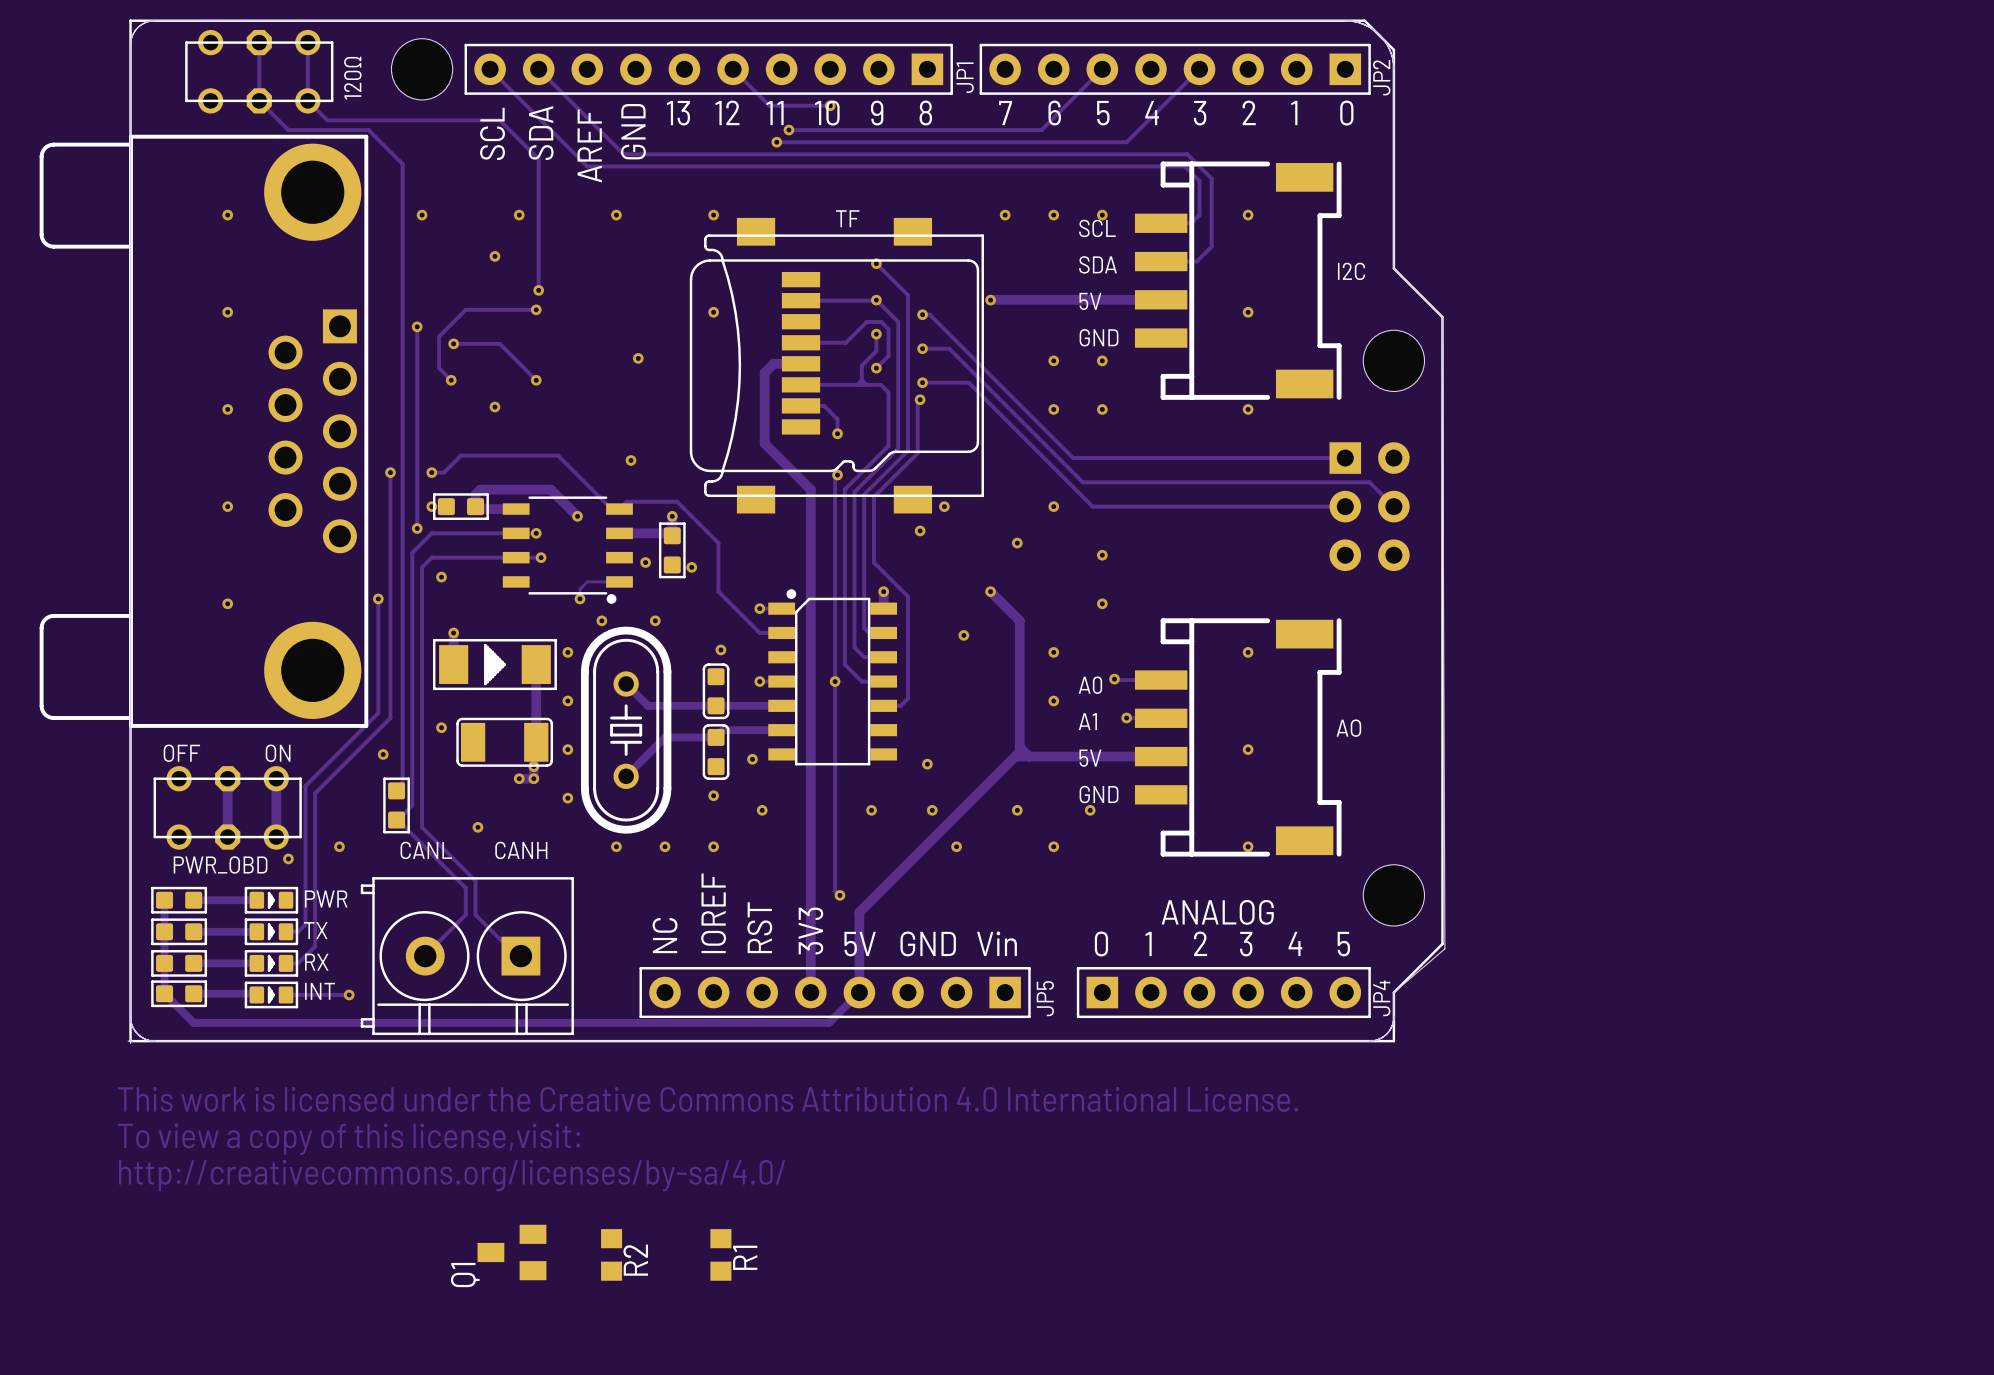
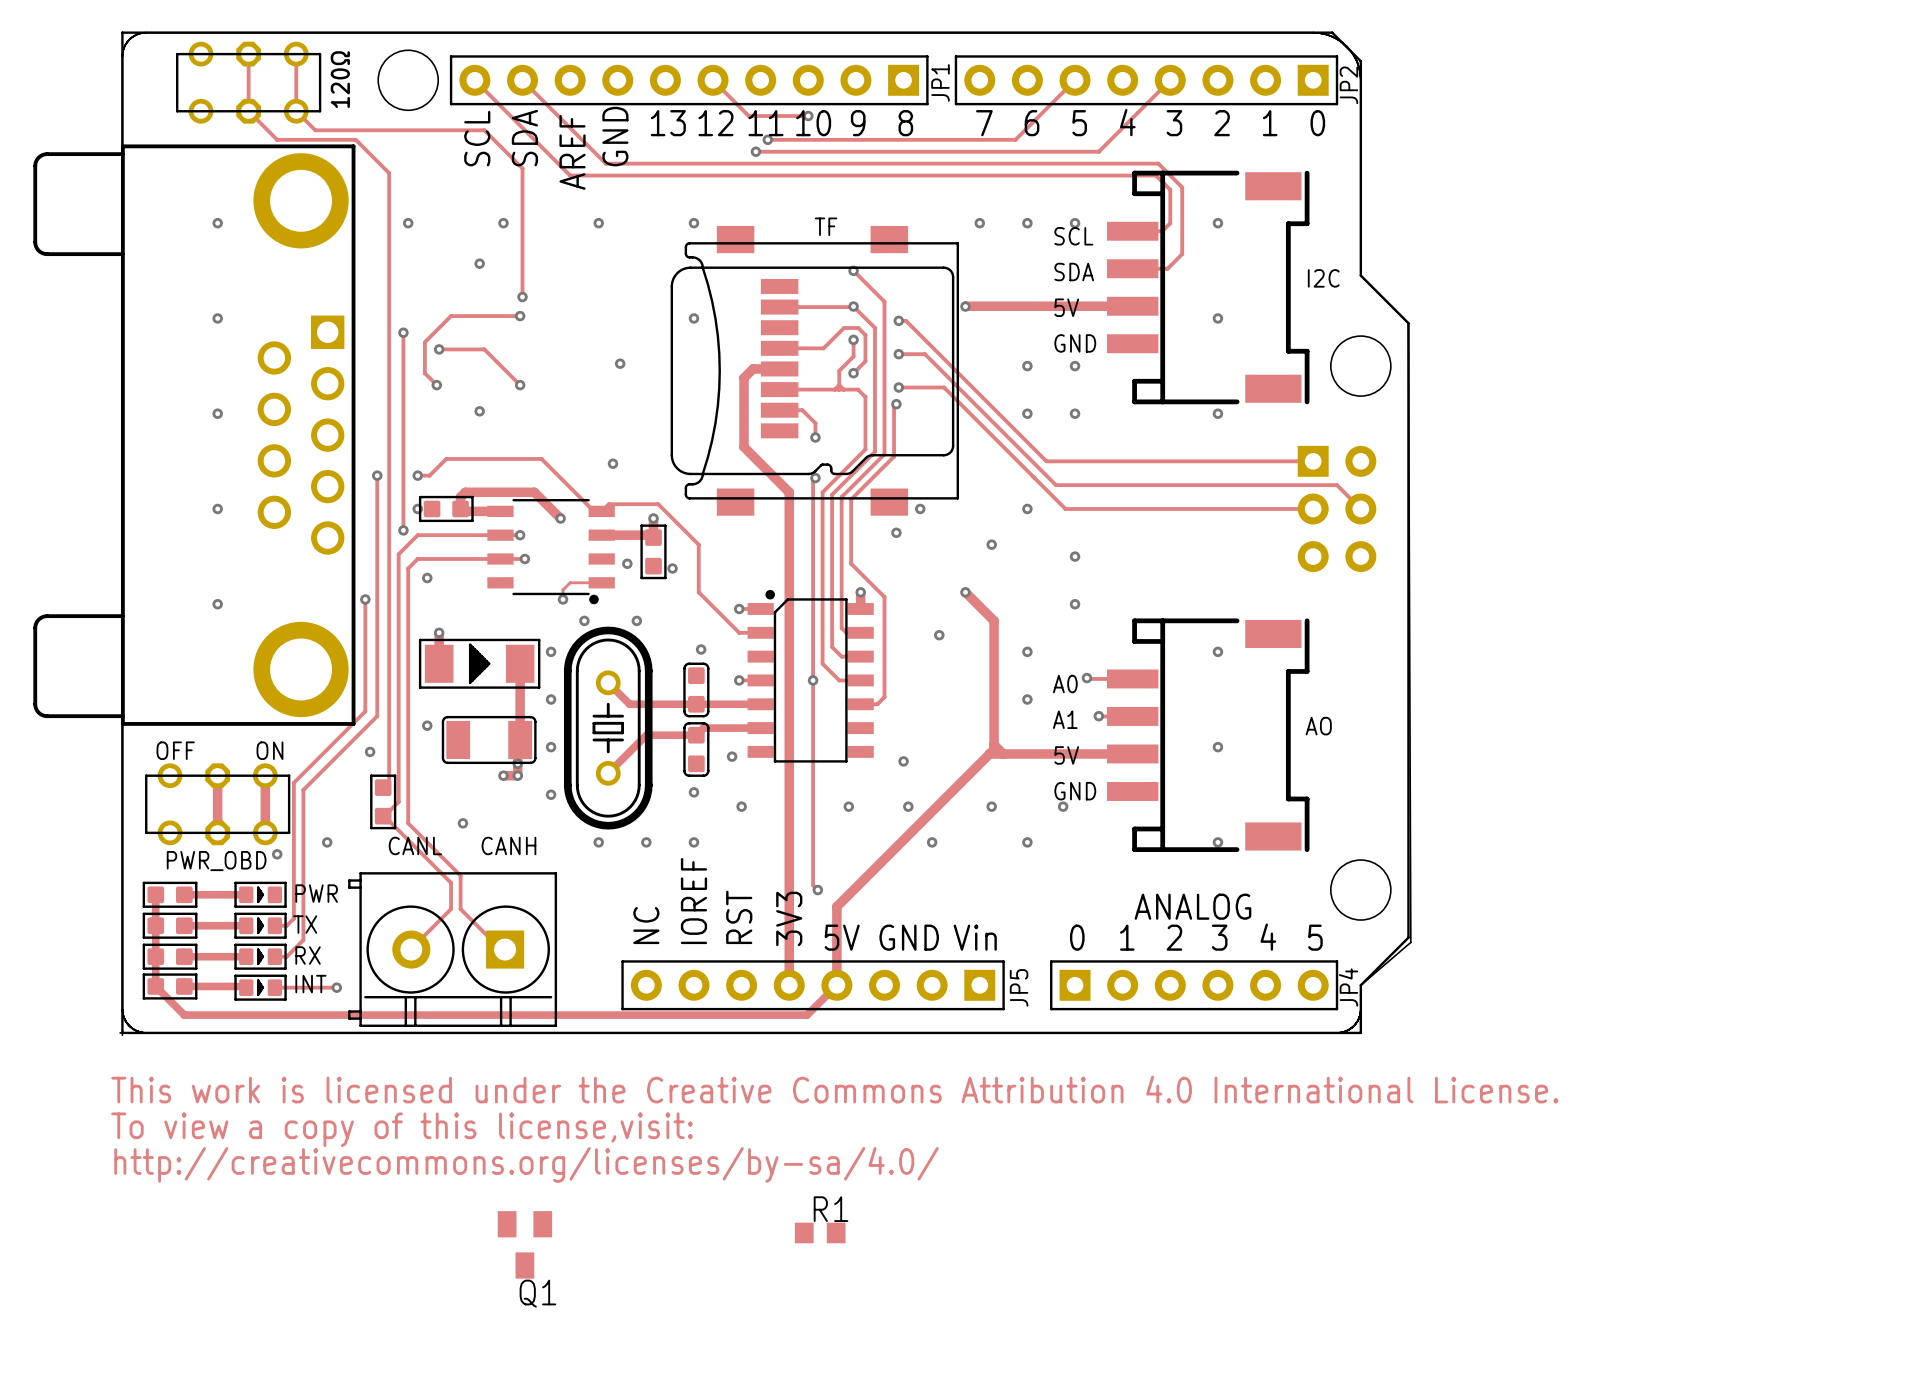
Q1 rotation: 0° (511, 1252) -> 90° counterclockwise (524, 1244)
R2: (611, 1254) -> none
R1 rotation: 0° (720, 1254) -> 90° clockwise (820, 1232)
R1 position: (720, 1254) -> (820, 1232)
R1 name position: R1 (745, 1257) -> R1 (830, 1209)

